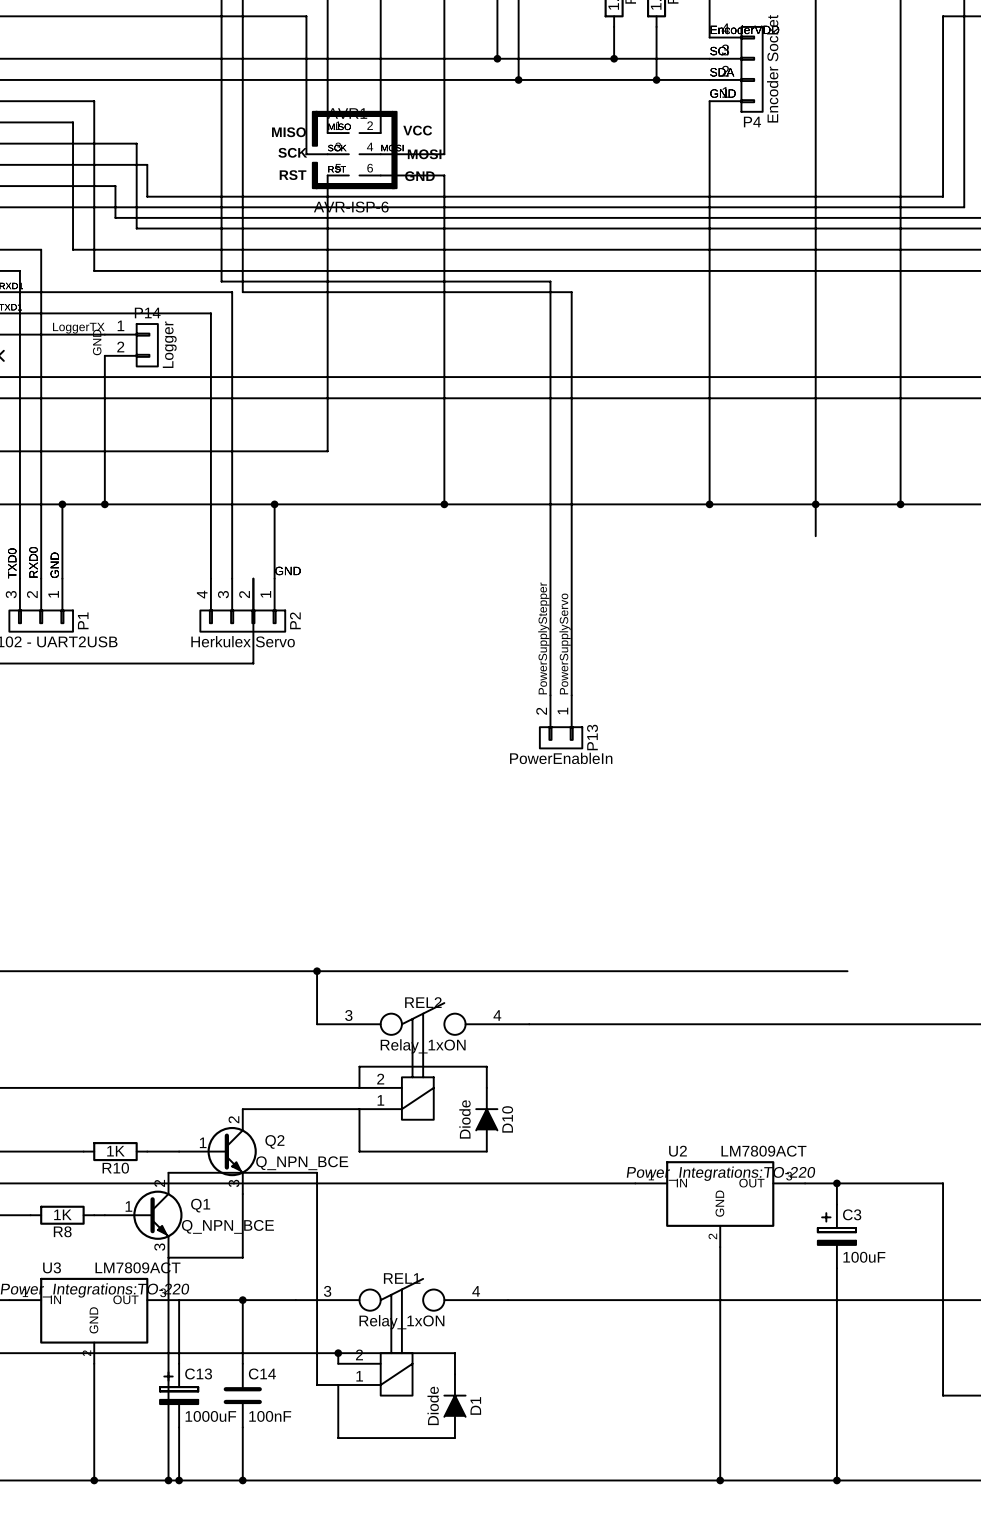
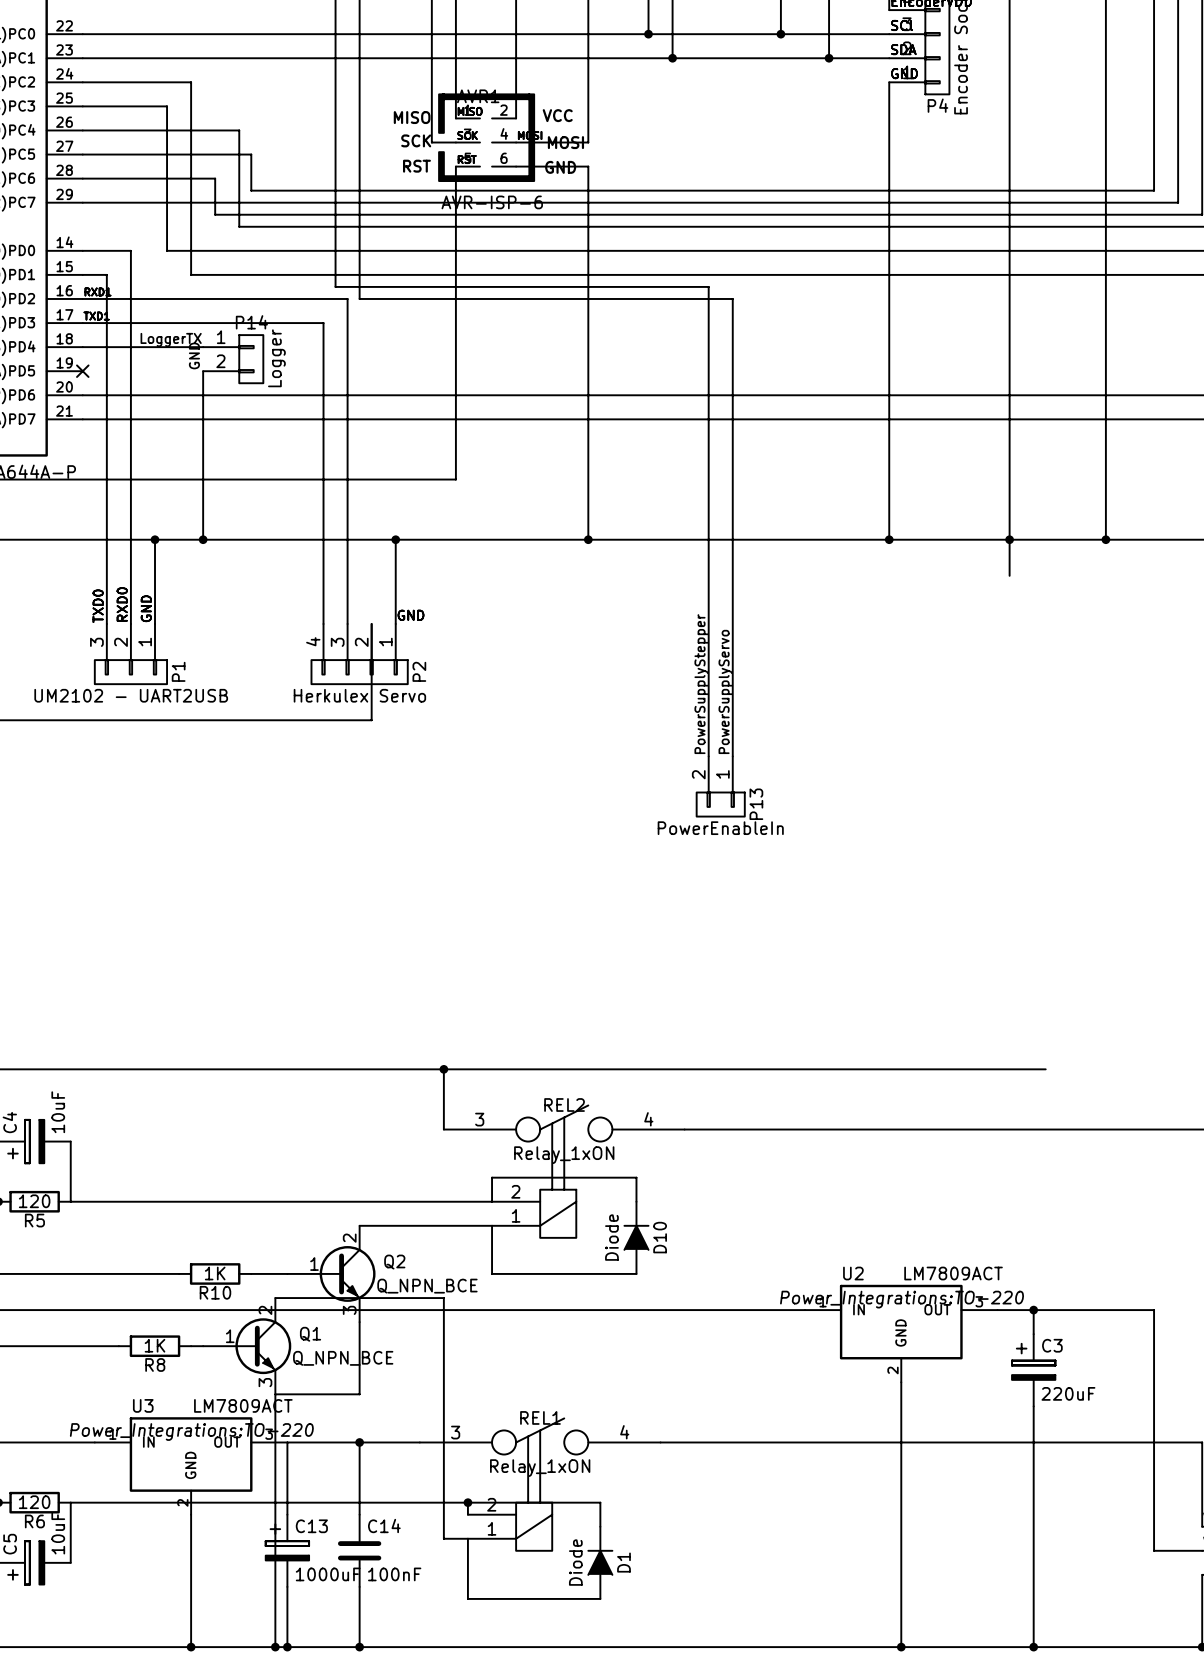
C3 value: 100uF (864, 1257) -> 220uF (1068, 1393)

